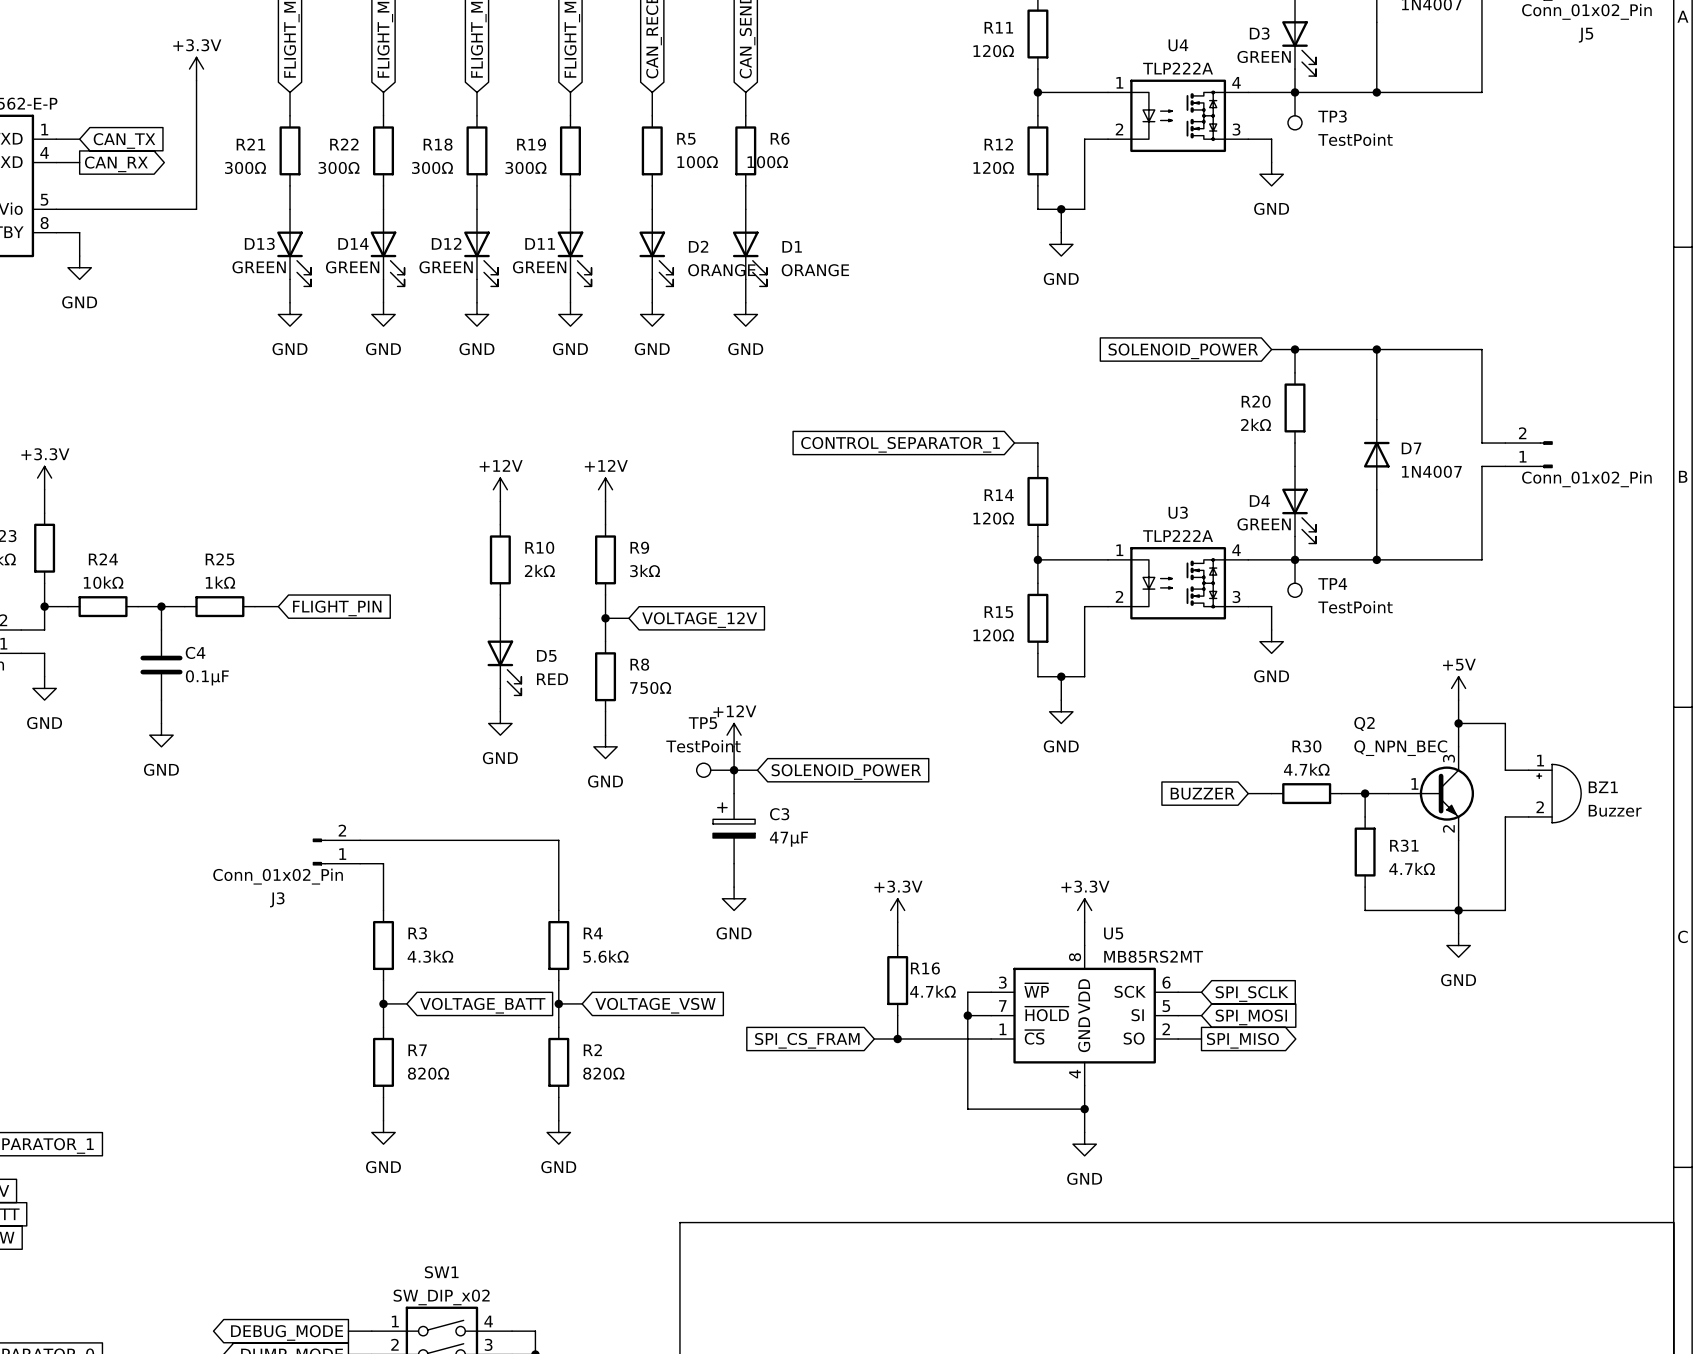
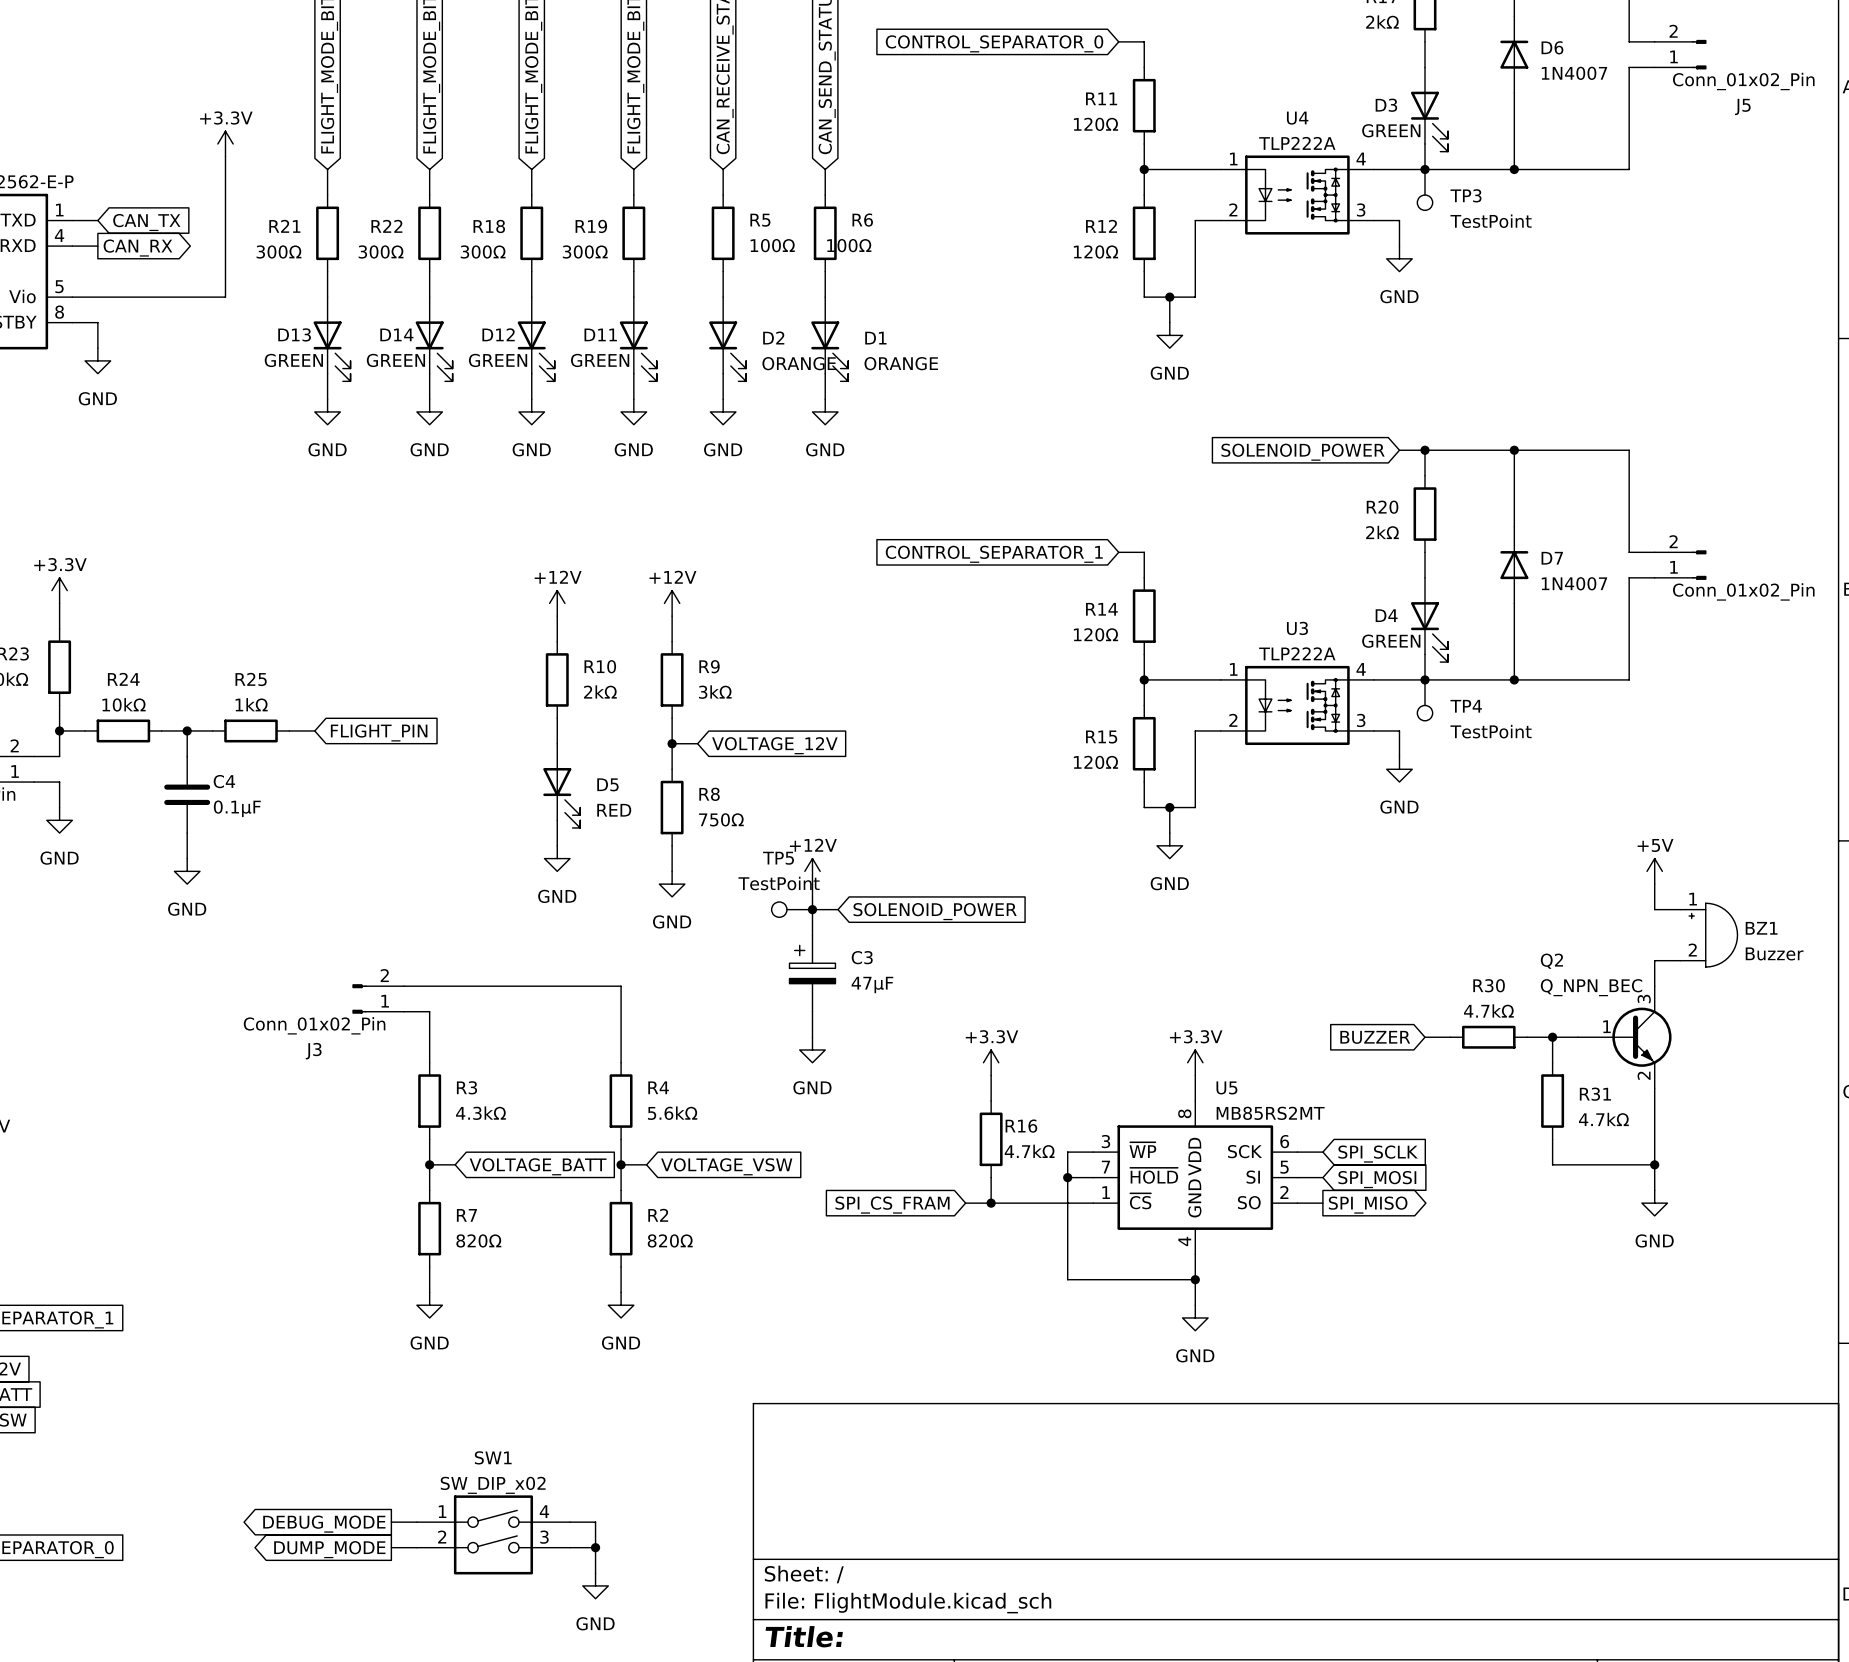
power symbol position: +5V (1458, 688) -> +5V (1654, 871)
wire: (1458, 700) (1458, 746) -> none
wire: (1458, 723) (1505, 723) (1505, 746) -> none
junction: (1458, 723) -> none
global label position: BUZZER (1202, 793) -> BUZZER (1375, 1037)
wire: (1248, 793) (1271, 793) -> (1425, 1037) (1450, 1037)
R30 position: (1306, 793) -> (1488, 1037)
wire: (1341, 793) (1388, 793) -> (1527, 1037) (1578, 1037)
wire: (1365, 793) (1365, 816) -> (1552, 1037) (1552, 1062)
junction: (1365, 793) -> none
Q2 position: (1431, 793) -> (1624, 1037)
wire: (1458, 840) (1458, 933) -> (1654, 1088) (1654, 1190)
wire: (1505, 840) (1505, 910) (1365, 910) (1365, 887) -> none
R31 position: (1365, 852) -> (1552, 1101)
junction: none -> (1552, 1037)
junction: (1458, 910) -> none
power symbol position: GND (1458, 945) -> GND (1654, 1203)
wire: none -> (1552, 1139) (1552, 1164) (1654, 1164)
junction: none -> (1654, 1164)

